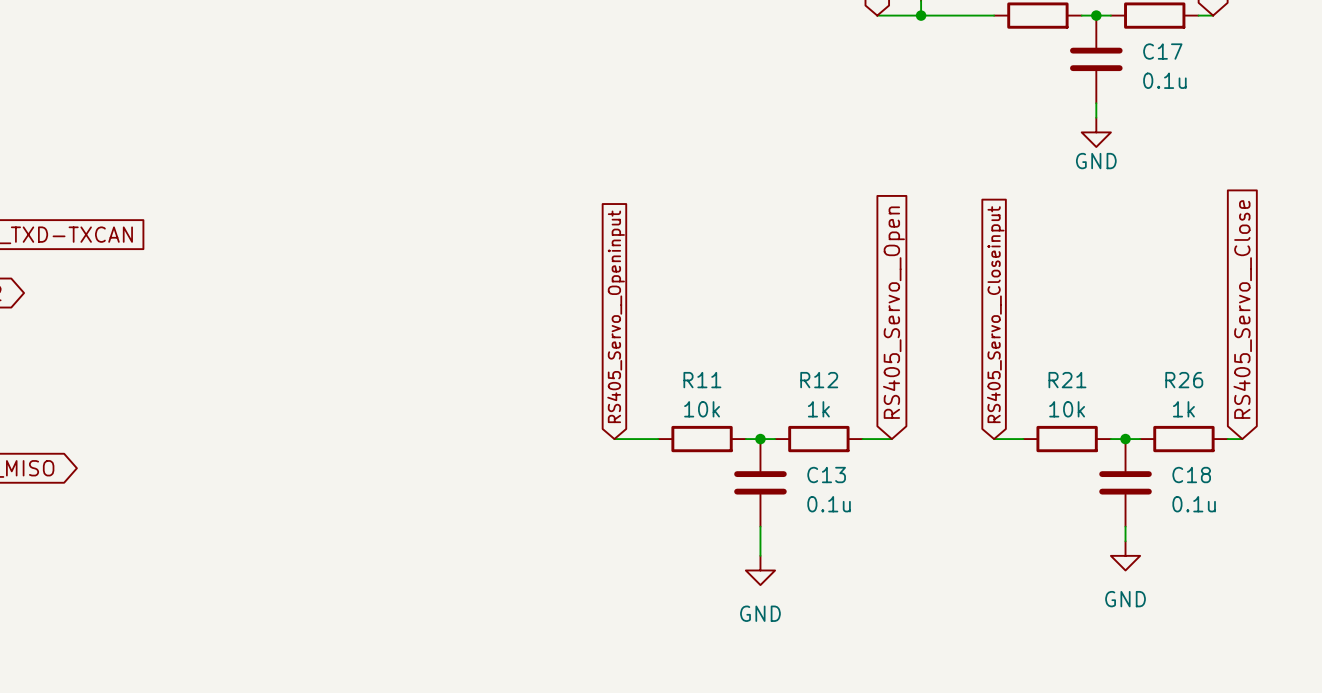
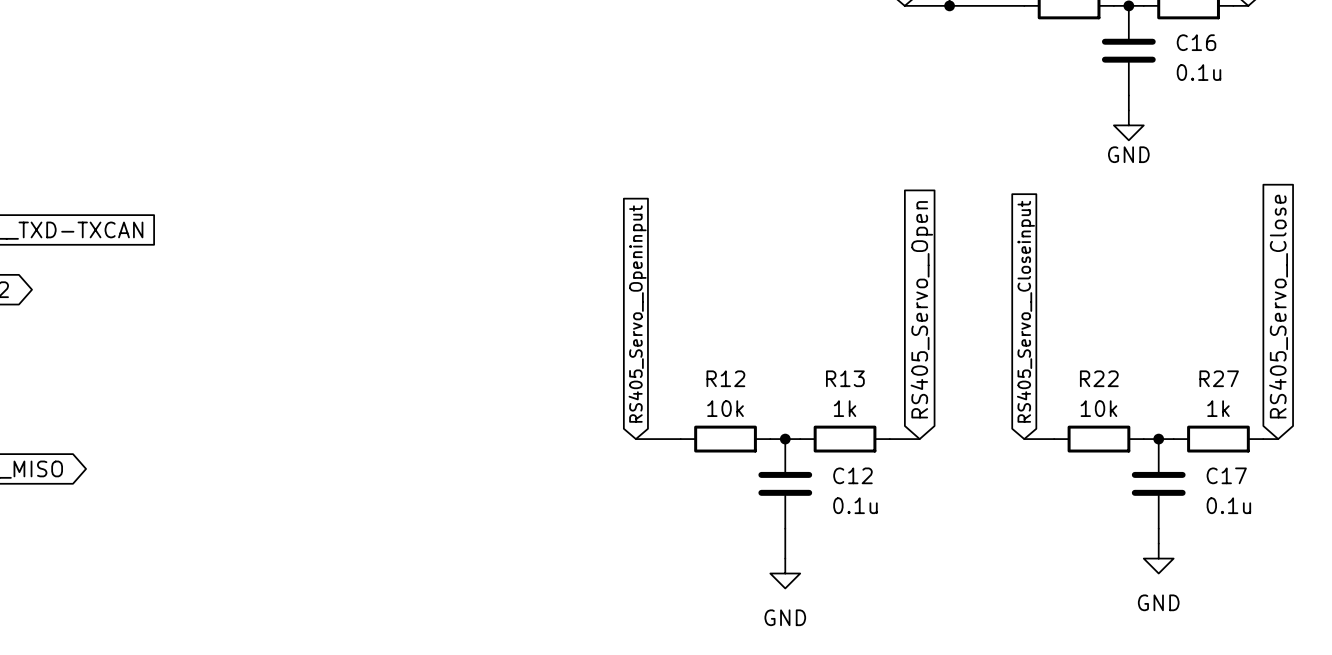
C17 name: C17 (1162, 51) -> C16 (1196, 42)
R11 name: R11 (702, 380) -> R12 (725, 378)
R12 name: R12 (819, 380) -> R13 (845, 378)
R21 name: R21 (1067, 380) -> R22 (1099, 378)
R26 name: R26 (1184, 380) -> R27 (1219, 378)
C13 name: C13 (826, 475) -> C12 (852, 475)
C18 name: C18 (1191, 475) -> C17 (1226, 475)

